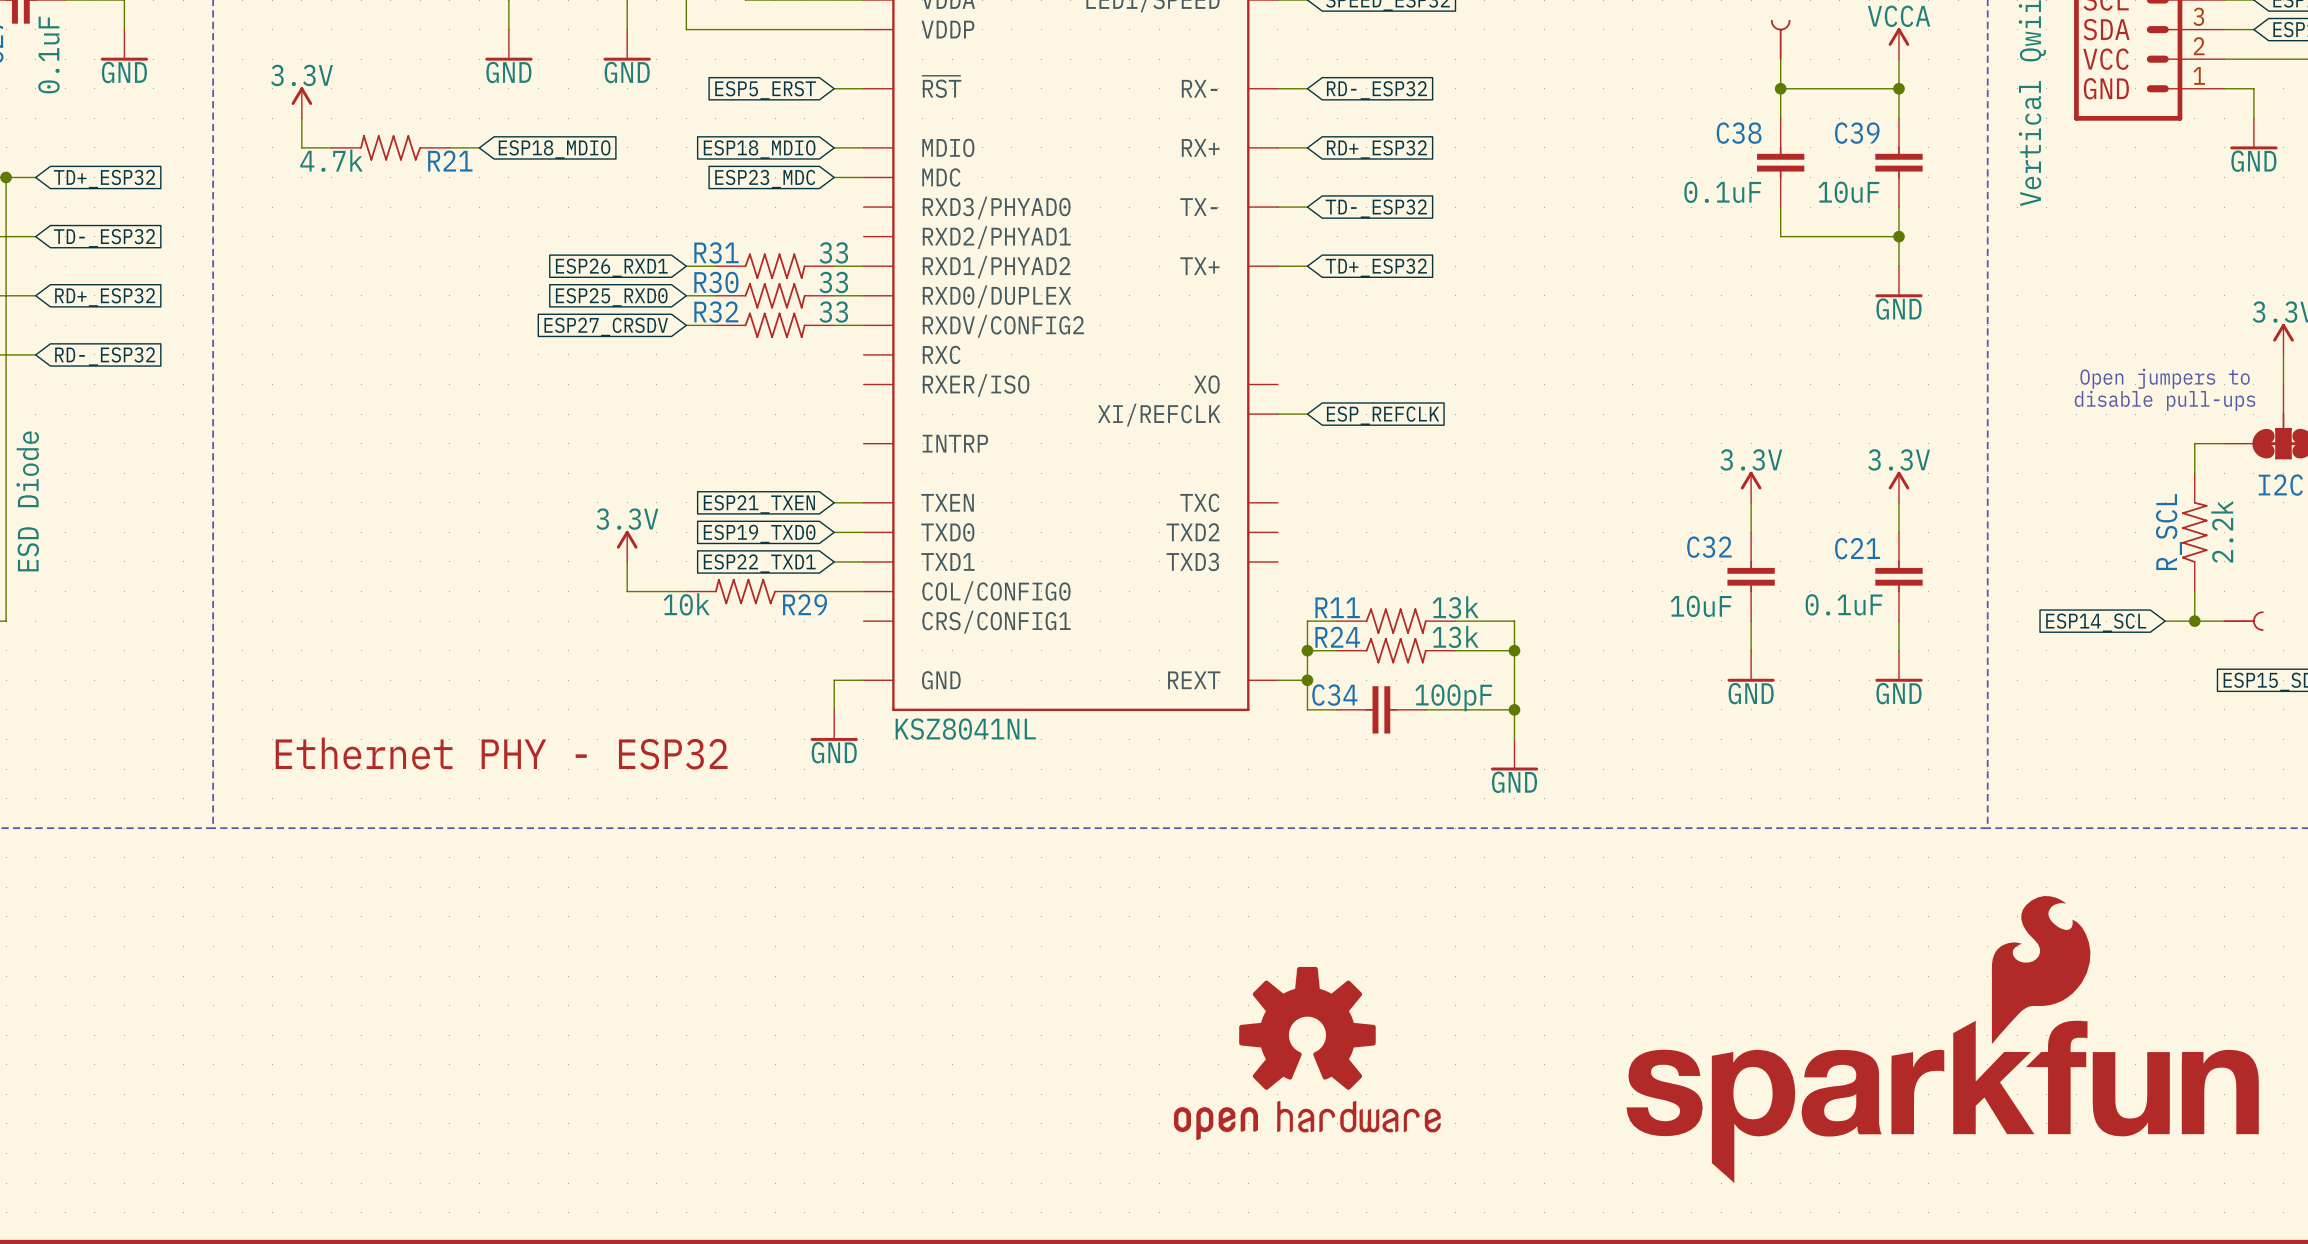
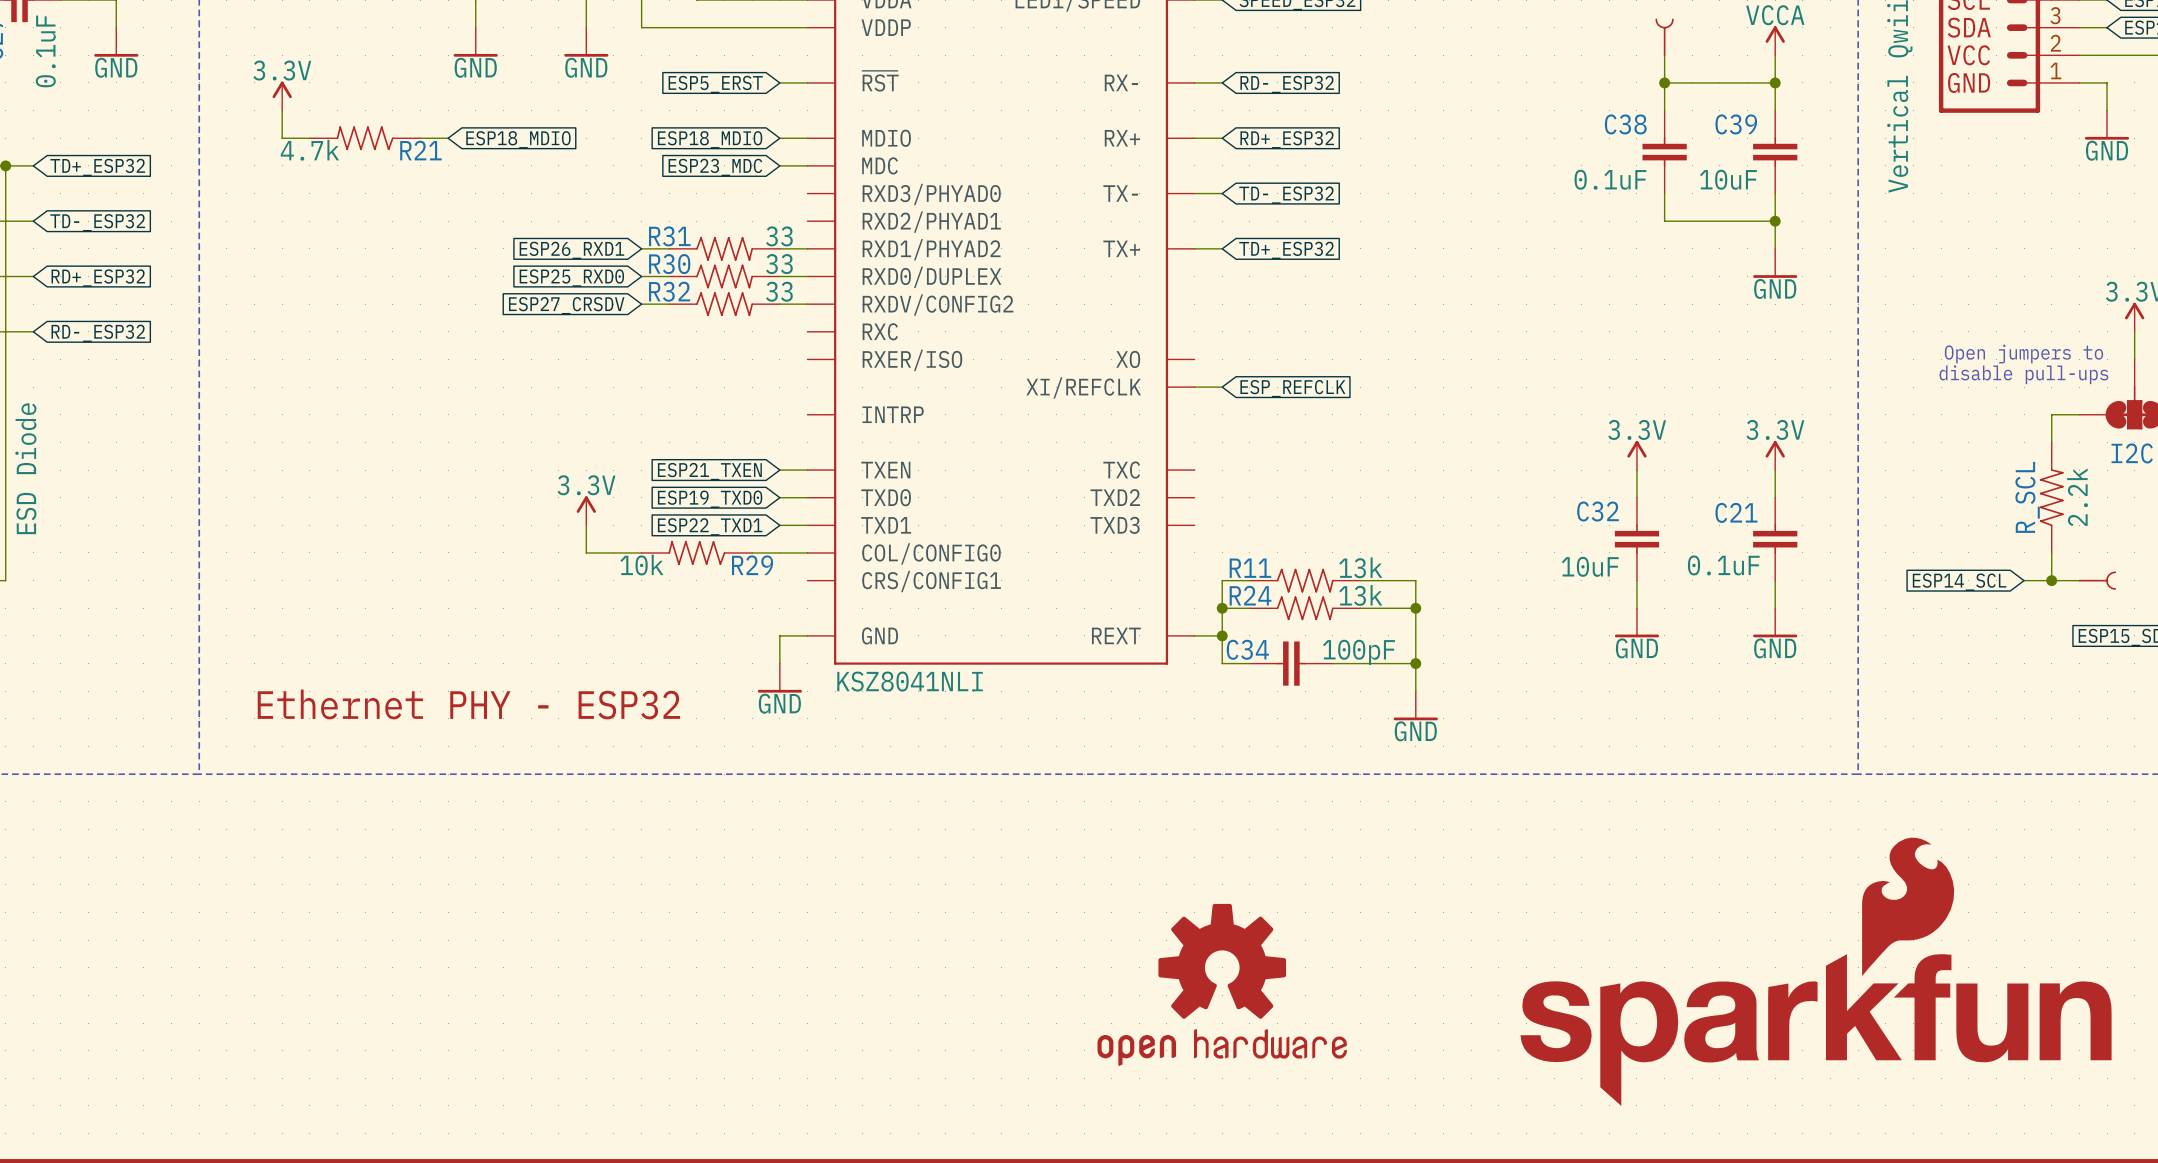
part value: KSZ8041NL (965, 729) -> KSZ8041NLI (910, 681)

